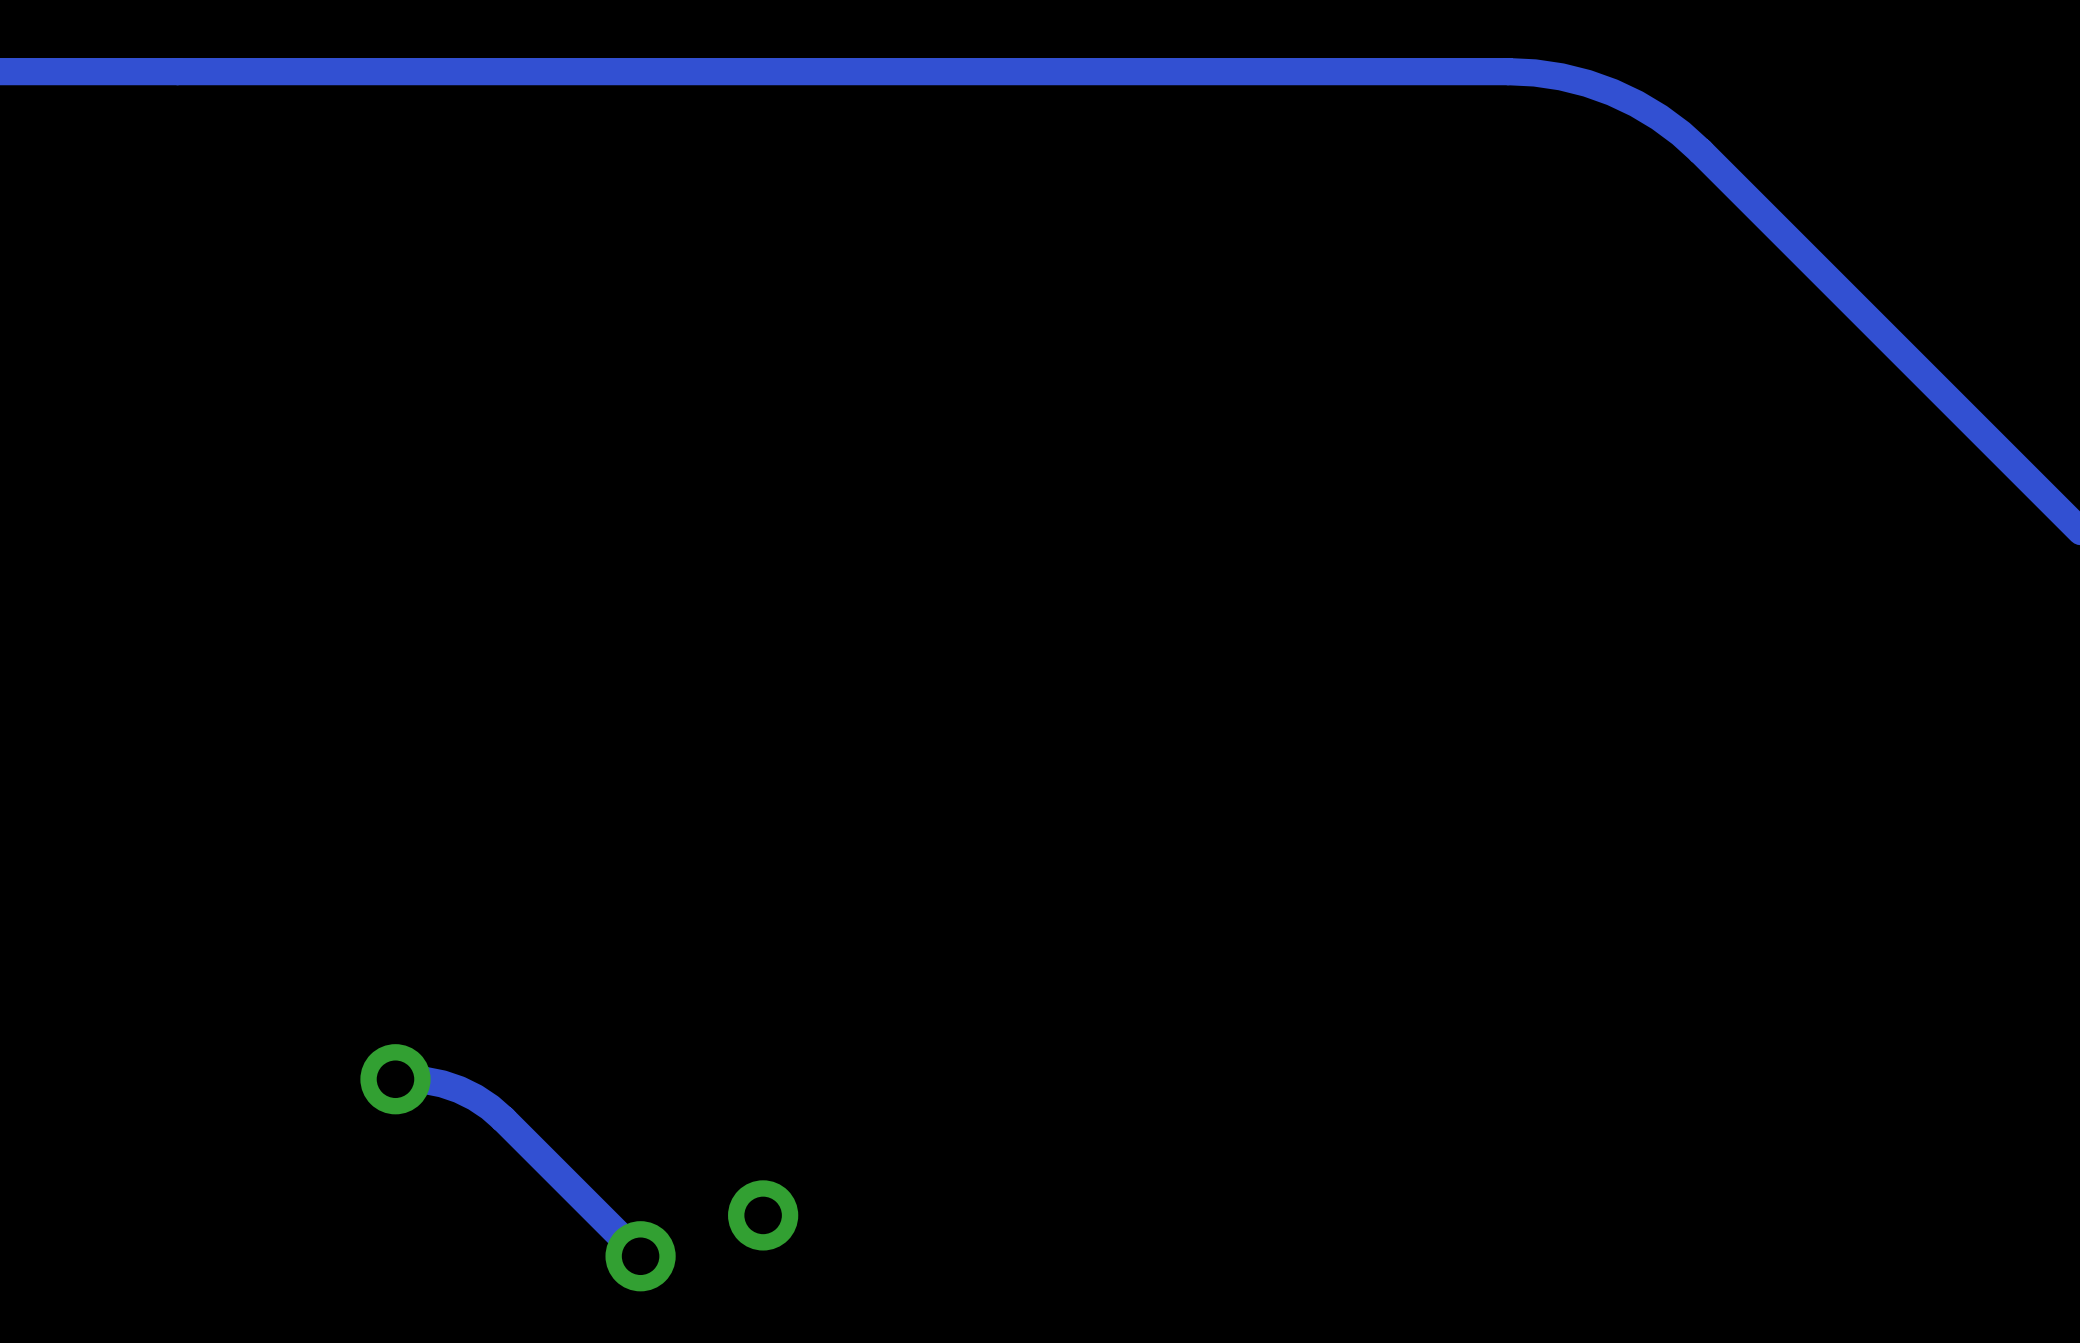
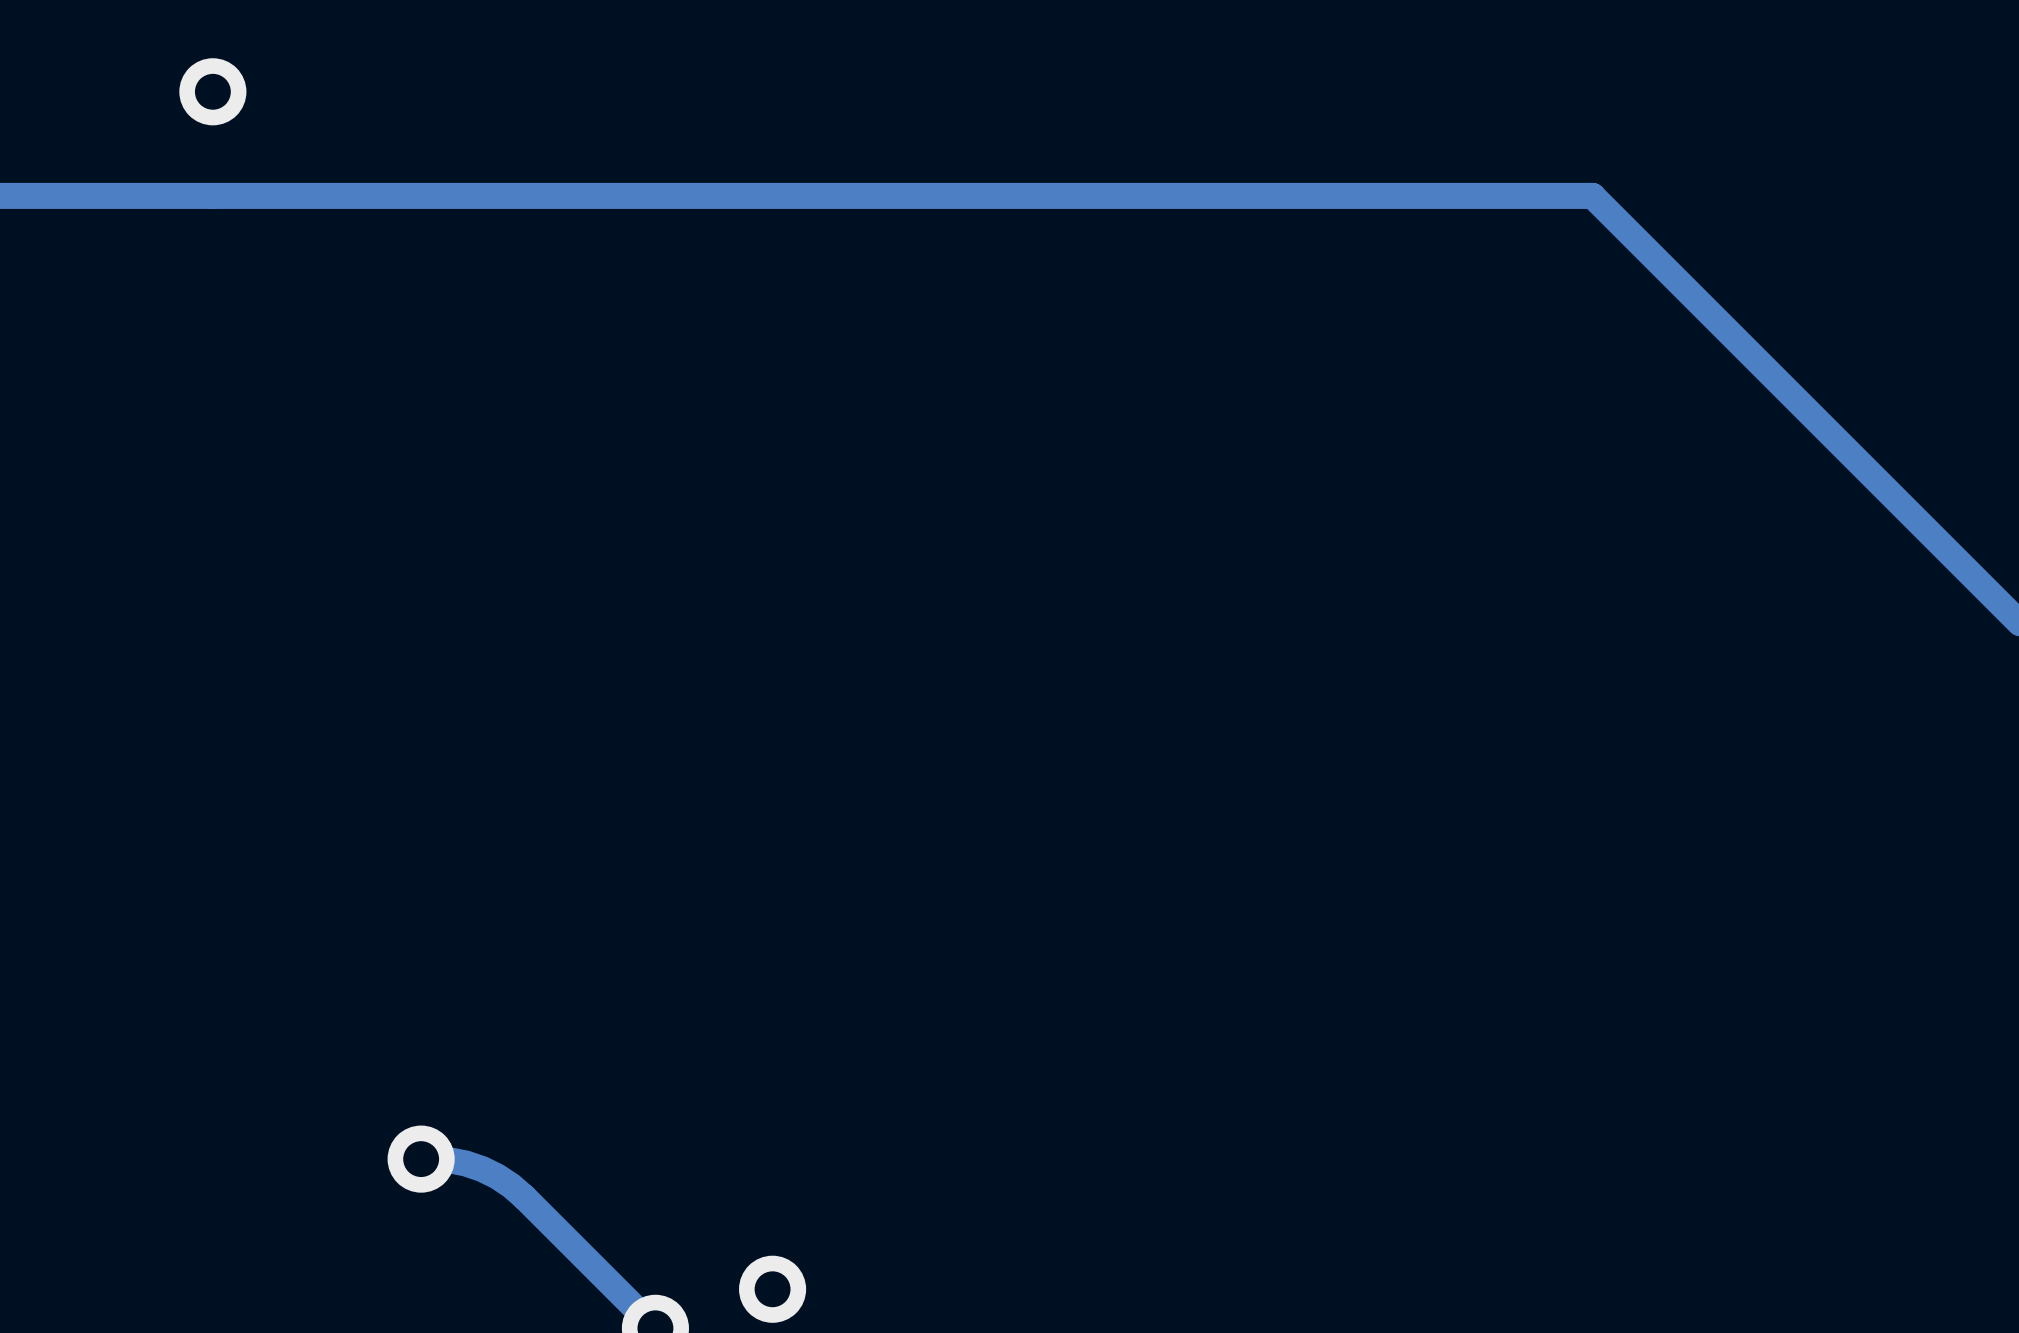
track: (1508, 71) (1561, 76) (1612, 92) (1659, 117) (1700, 151) -> (1484, 195) (1592, 195) (1668, 272)

